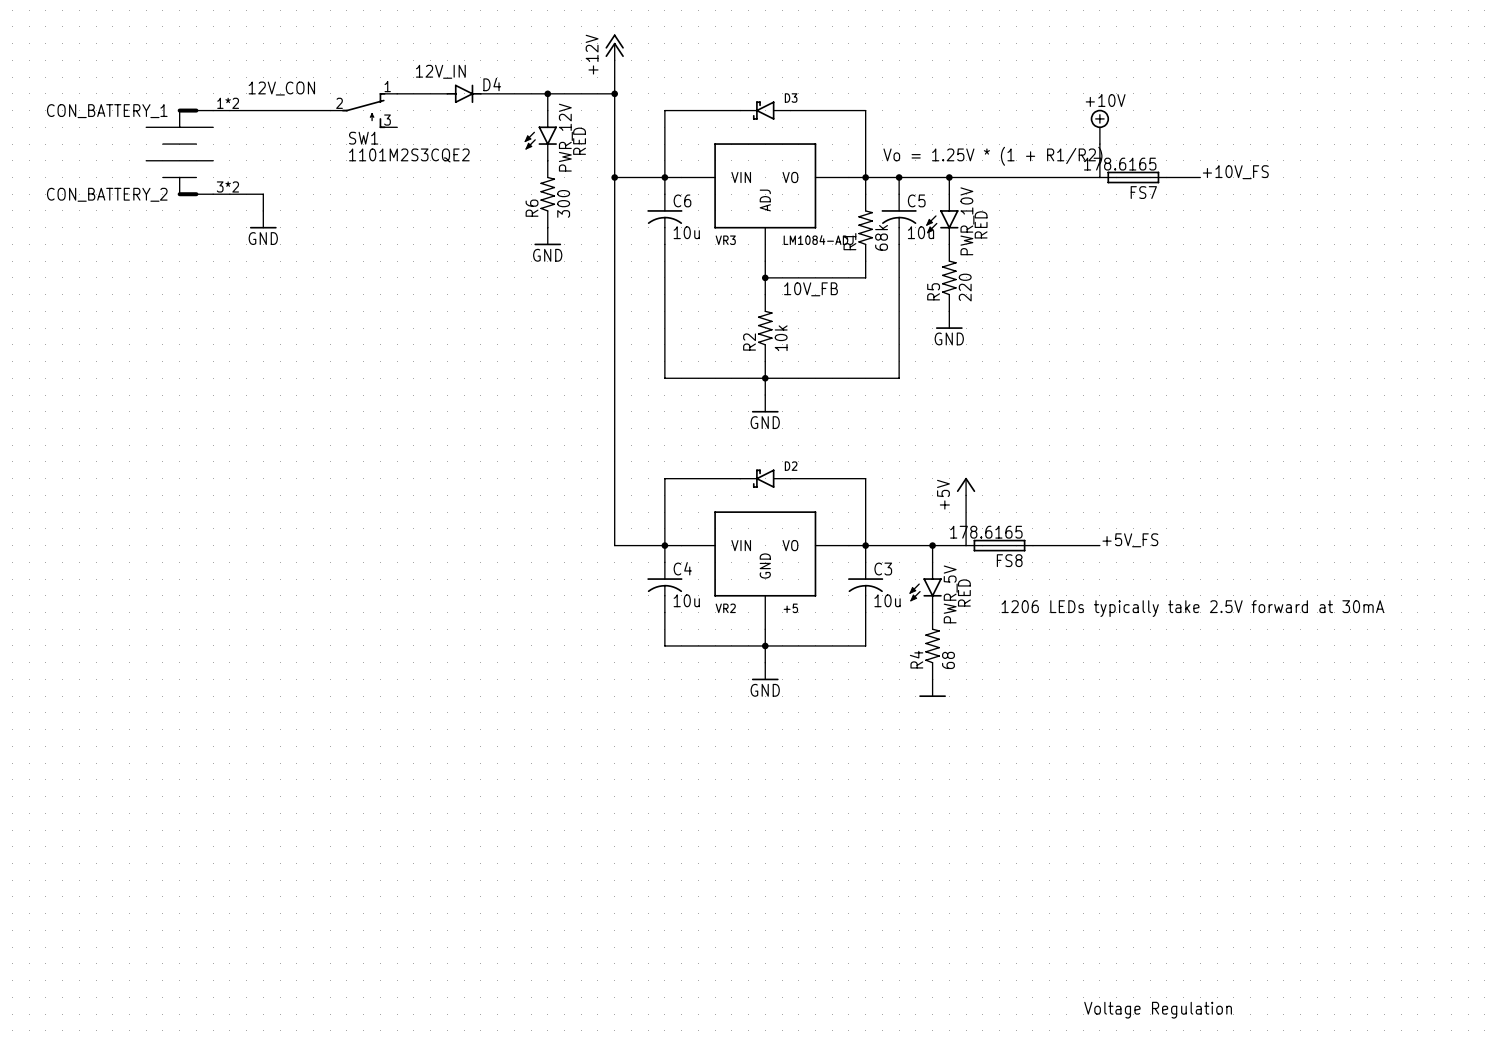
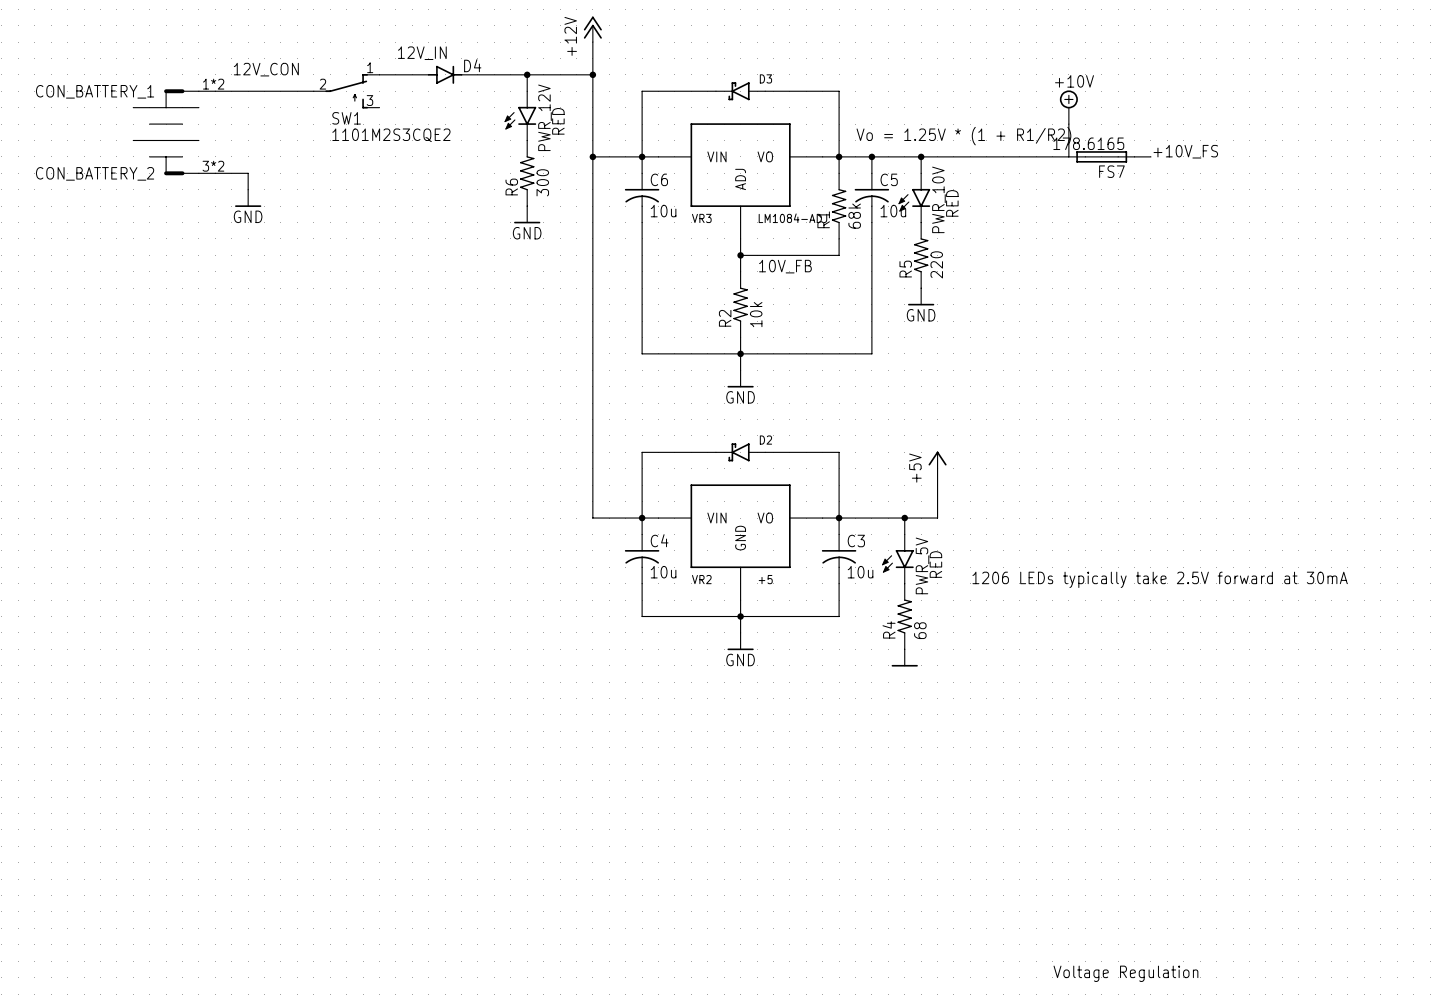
label position: +10V_FS (1235, 172) -> +10V_FS (1185, 151)
wire: (1183, 177) (1200, 177) -> none
label: +5V_FS (1130, 540) -> none
FS8: 178.6165 (999, 545) -> none
wire: (1032, 545) (1099, 545) -> none

